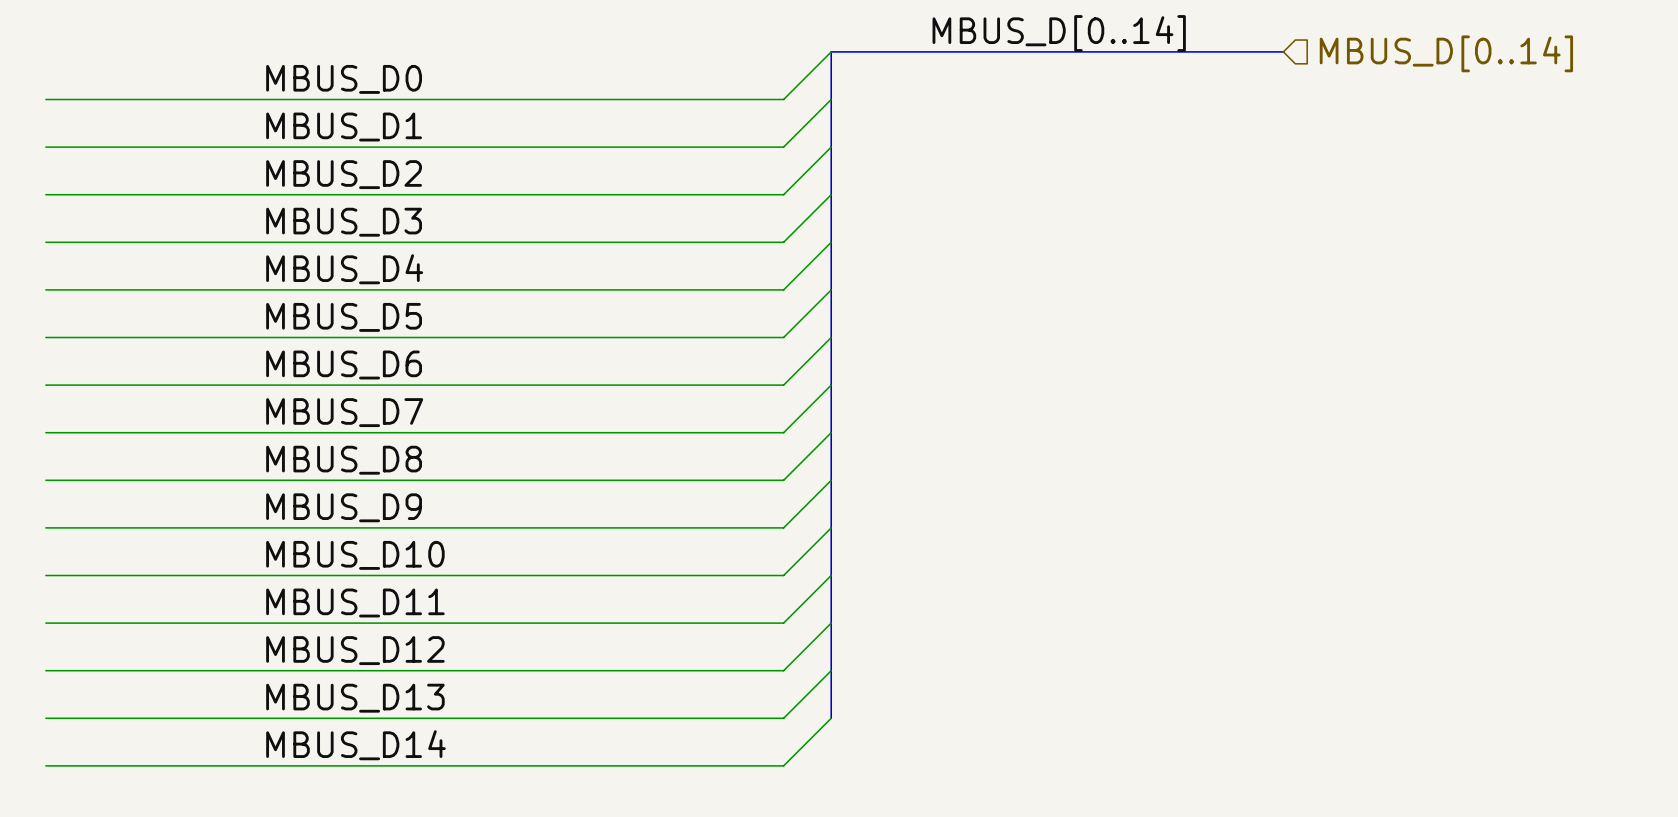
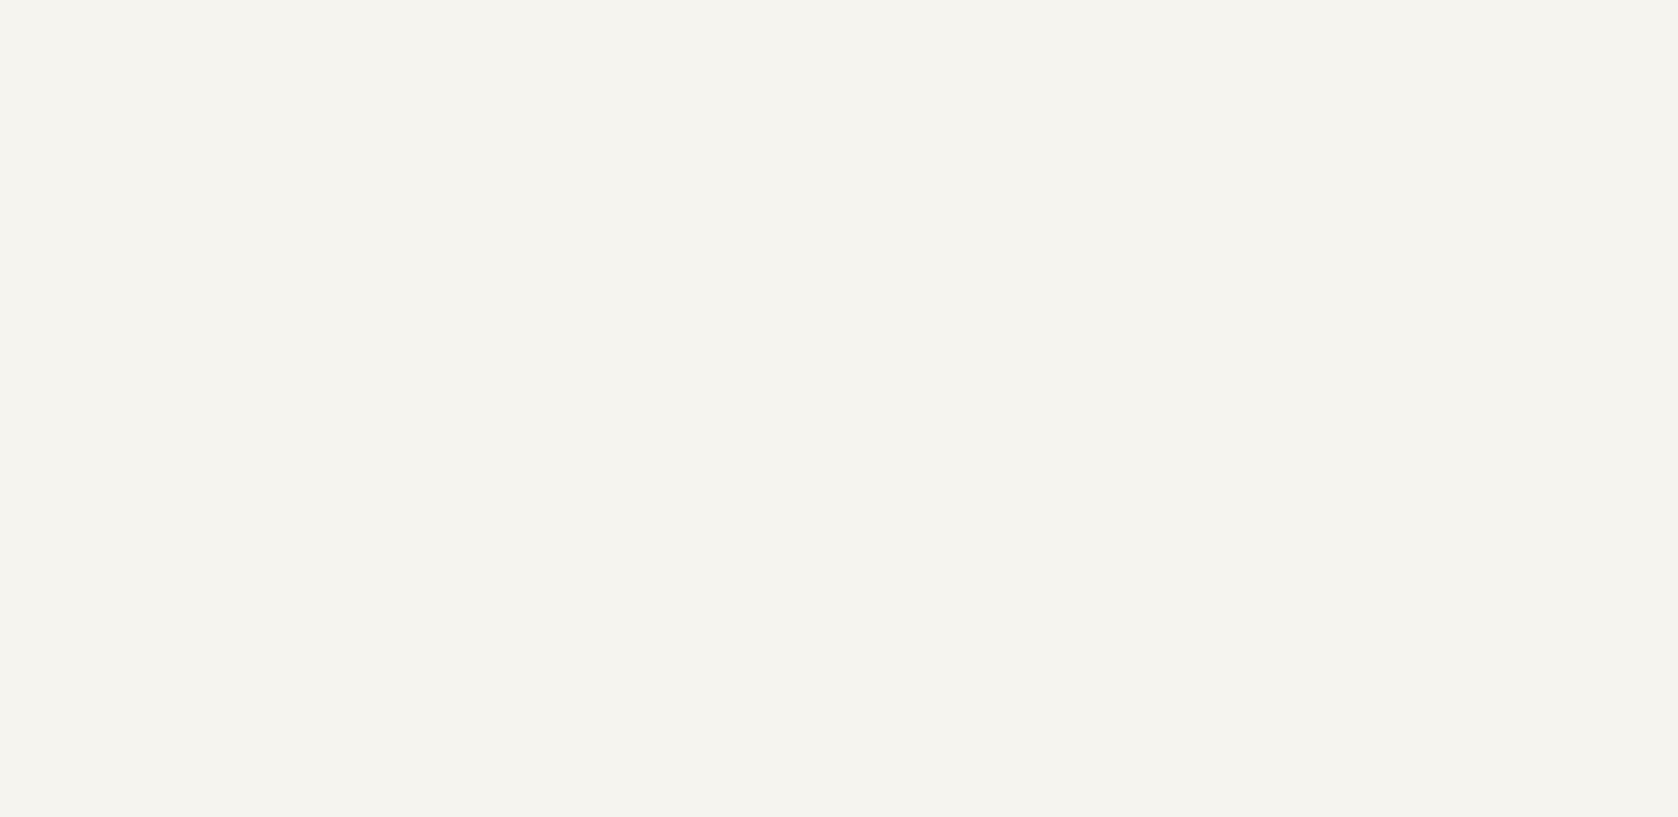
label: MBUS_D[0..14] (1059, 33) -> none
wire: (831, 51) (783, 99) (45, 99) -> none
bus: (1283, 51) (831, 51) (831, 718) -> none
hierarchical label: MBUS_D[0..14] (1446, 53) -> none
label: MBUS_D0 (344, 79) -> none
wire: (831, 99) (783, 147) (45, 147) -> none
label: MBUS_D1 (344, 127) -> none
wire: (831, 147) (783, 194) (45, 194) -> none
label: MBUS_D2 (344, 174) -> none
wire: (831, 194) (783, 242) (45, 242) -> none
label: MBUS_D3 (344, 222) -> none
wire: (831, 242) (783, 289) (45, 289) -> none
label: MBUS_D4 (344, 269) -> none
wire: (831, 289) (783, 337) (45, 337) -> none
label: MBUS_D5 (344, 317) -> none
wire: (831, 337) (783, 385) (45, 385) -> none
label: MBUS_D6 (344, 365) -> none
wire: (831, 385) (783, 432) (45, 432) -> none
label: MBUS_D7 (344, 412) -> none
wire: (831, 432) (783, 480) (45, 480) -> none
label: MBUS_D8 (344, 460) -> none
wire: (831, 480) (783, 527) (45, 527) -> none
label: MBUS_D9 (344, 507) -> none
wire: (831, 527) (783, 575) (45, 575) -> none
label: MBUS_D10 (355, 555) -> none
wire: (831, 575) (783, 623) (45, 623) -> none
label: MBUS_D11 (355, 602) -> none
wire: (831, 623) (783, 670) (45, 670) -> none
label: MBUS_D12 (355, 650) -> none
wire: (831, 670) (783, 718) (45, 718) -> none
label: MBUS_D13 (355, 698) -> none
wire: (831, 718) (783, 765) (45, 765) -> none
label: MBUS_D14 (355, 745) -> none

